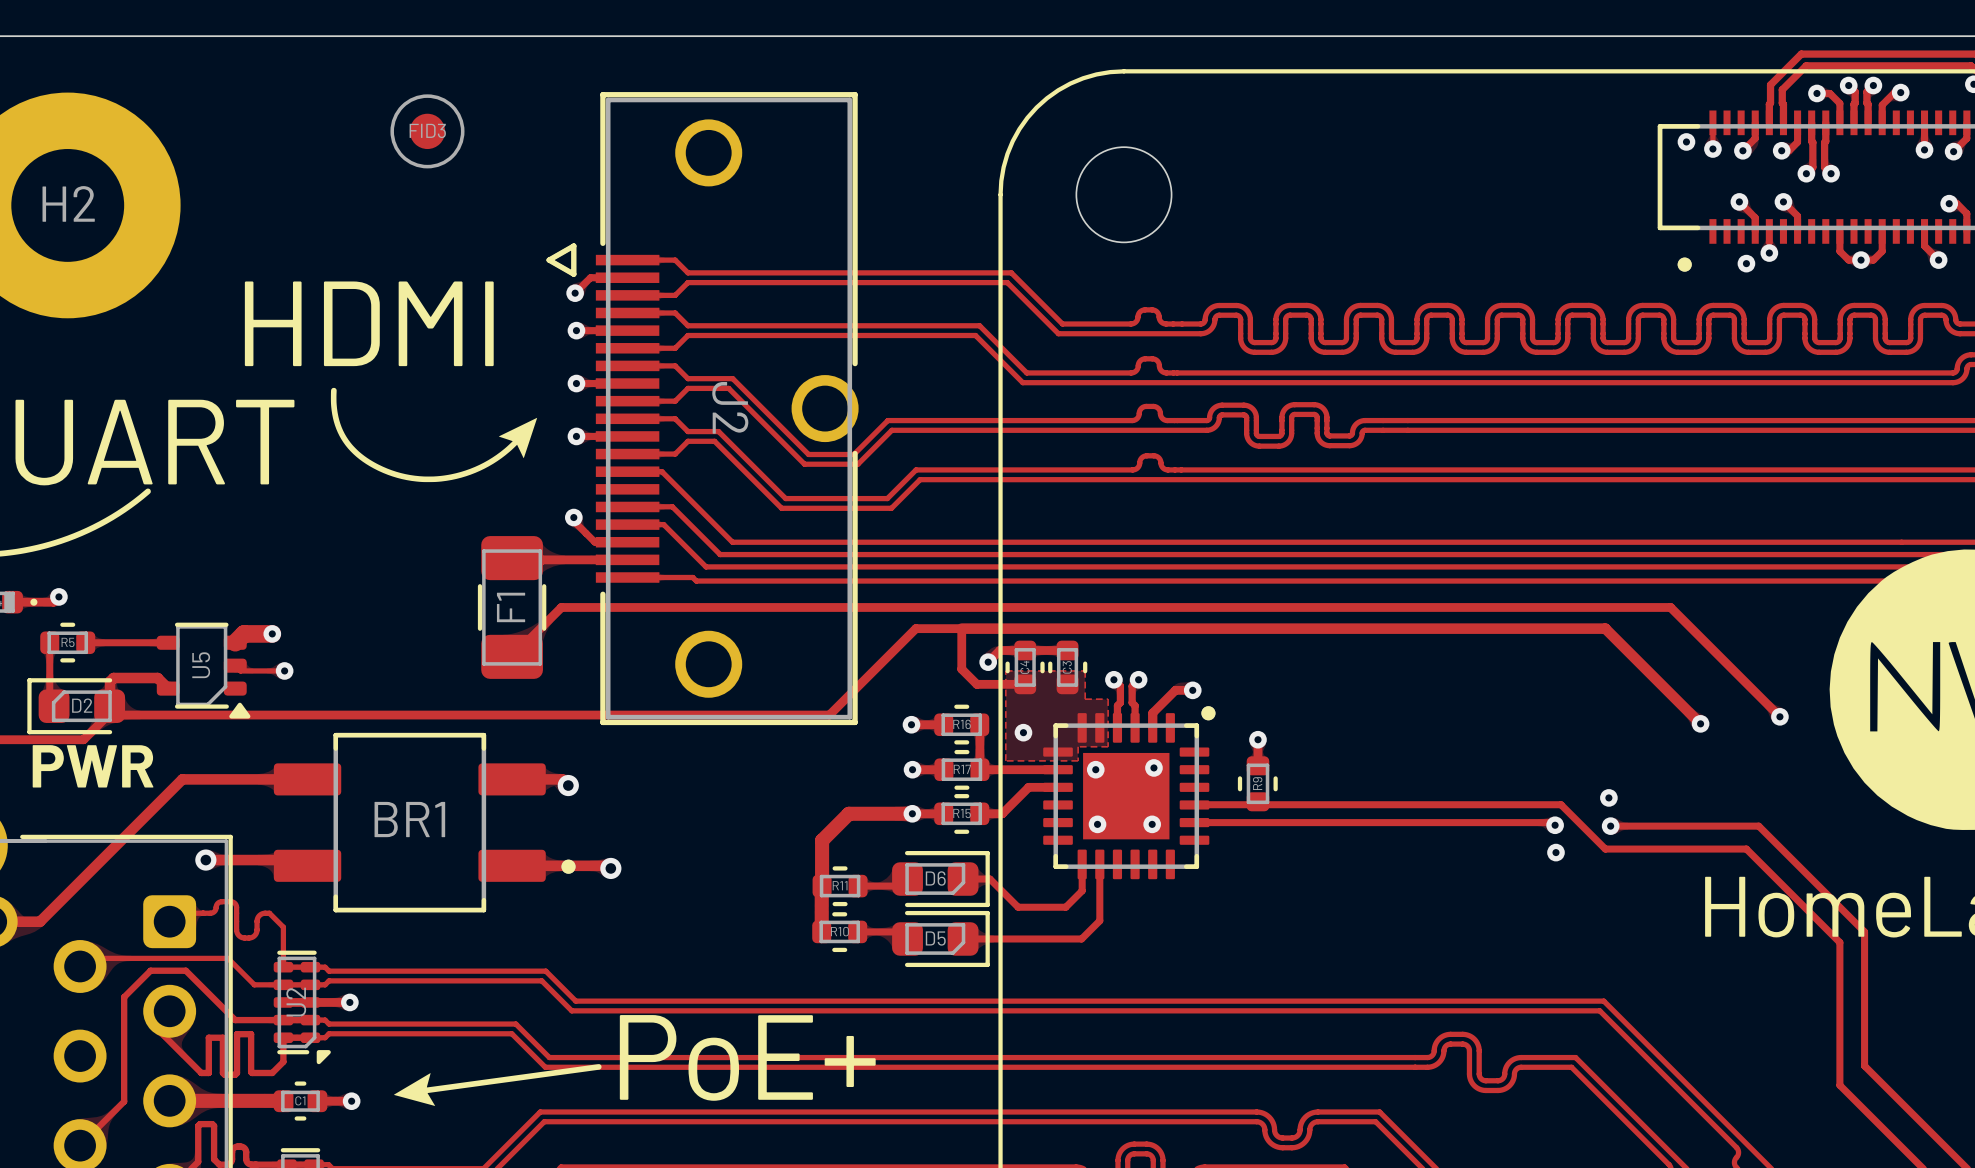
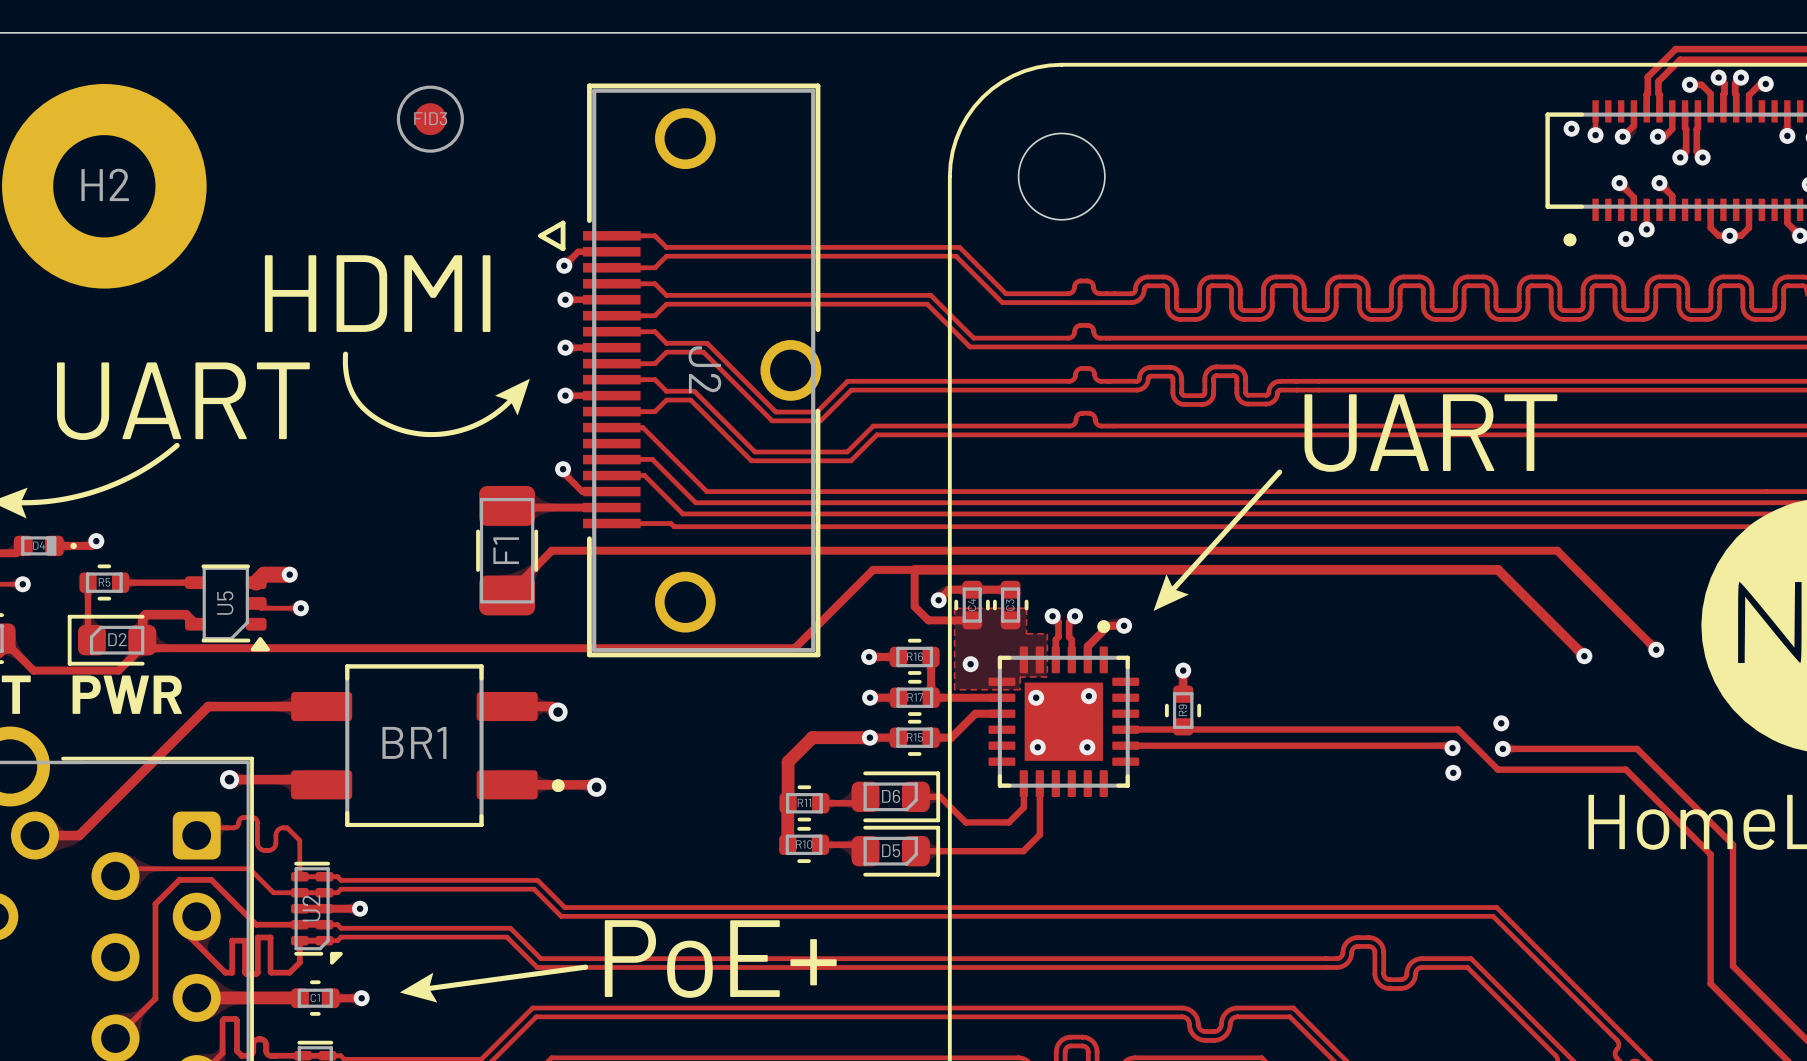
text: none -> UART (1430, 433)
drawing: none -> [1153, 469, 1283, 611]
part footprint: [1043, 706, 1216, 880] -> [988, 620, 1140, 798]

